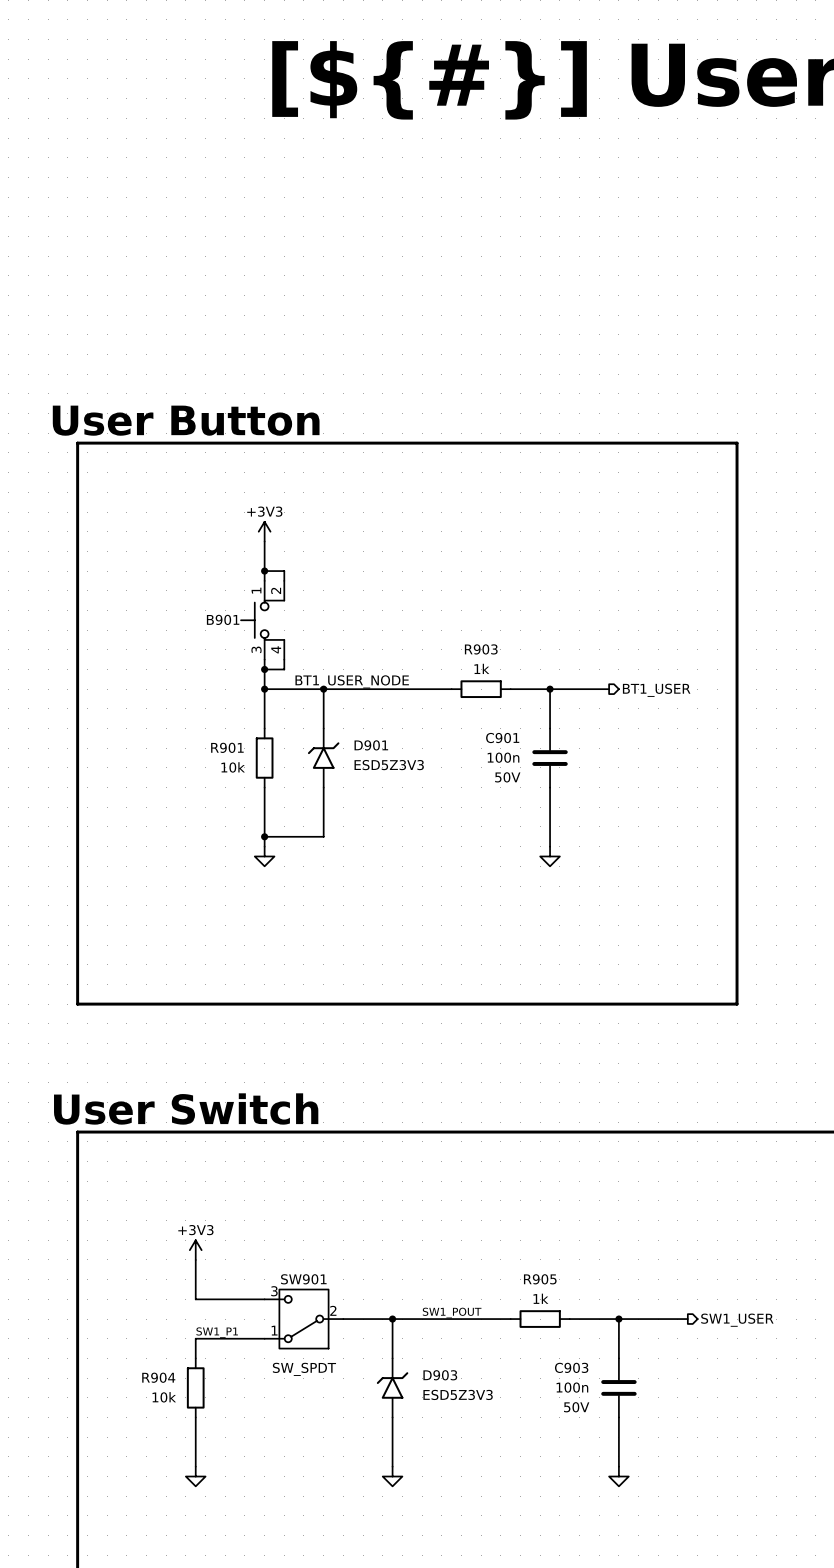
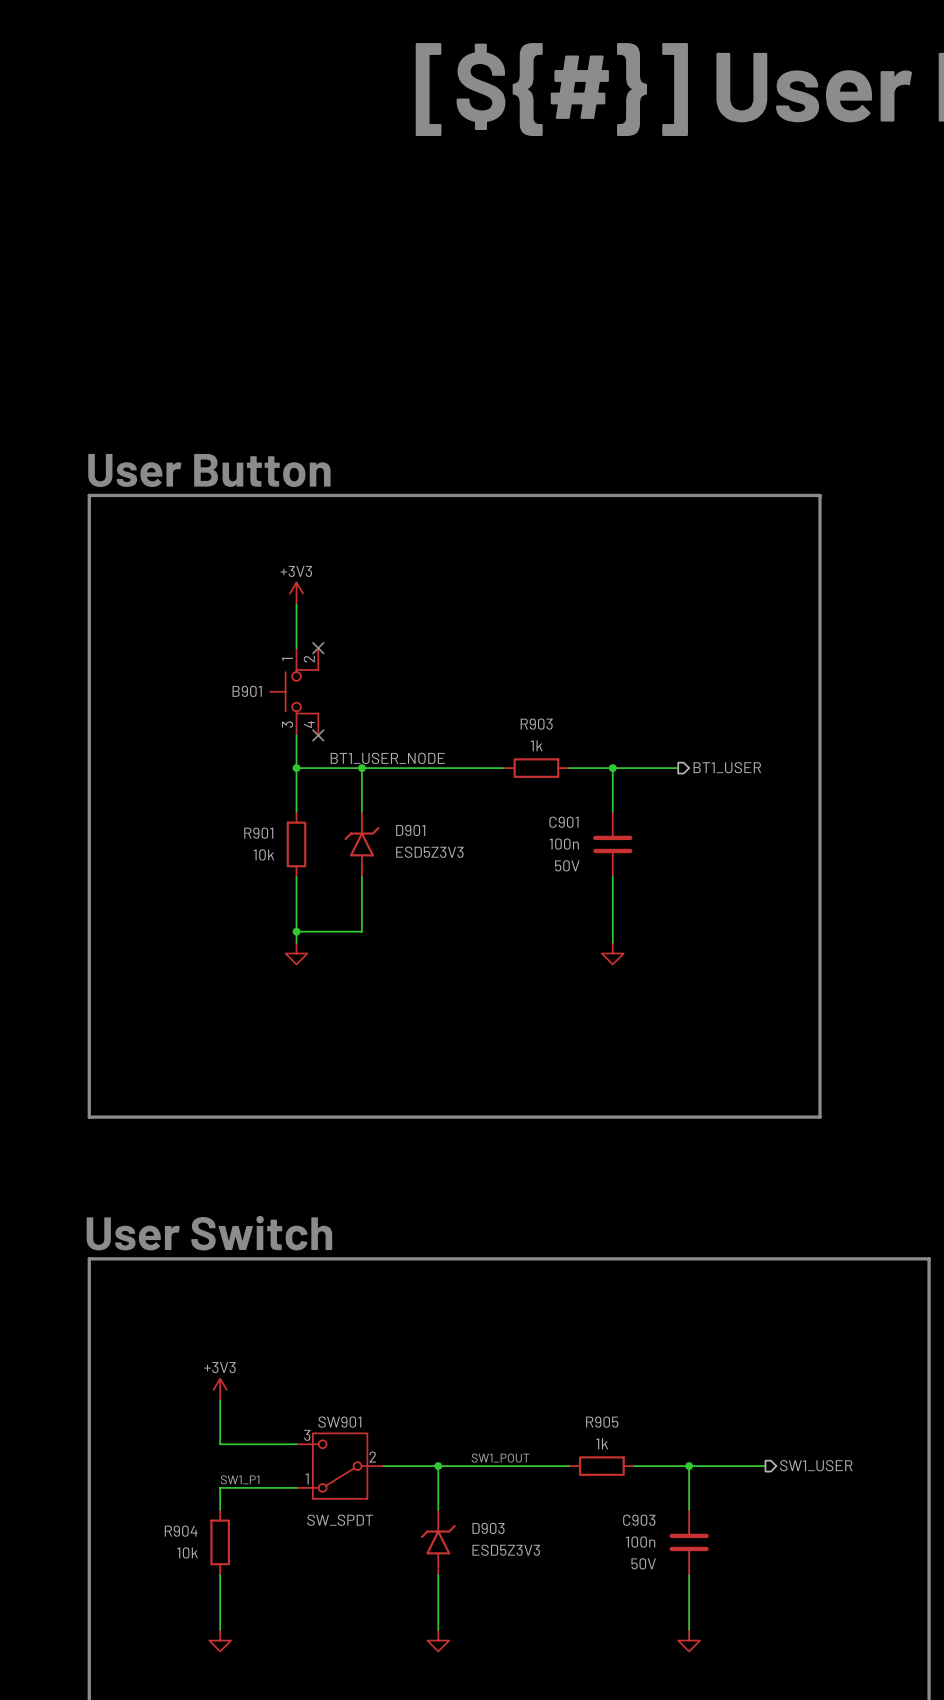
wire: (264, 571) (284, 571) (284, 580) -> none
junction: (264, 571) -> none
no-connect mark: none -> (318, 648)
wire: (284, 659) (284, 669) (264, 669) -> none
no-connect mark: none -> (318, 735)
junction: (264, 669) -> none

